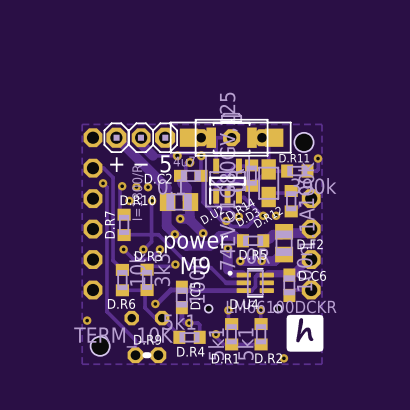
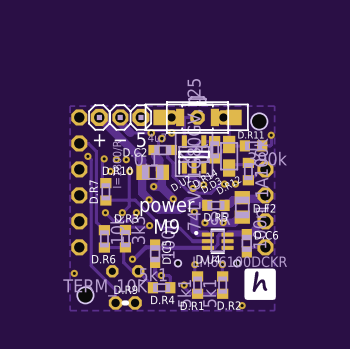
track: (194, 153) (200, 159) (203, 202) (224, 223) -> (167, 151) (167, 157) (173, 162) (173, 176) (189, 192) (191, 190)
track: (238, 196) (243, 197) (262, 215) -> none

